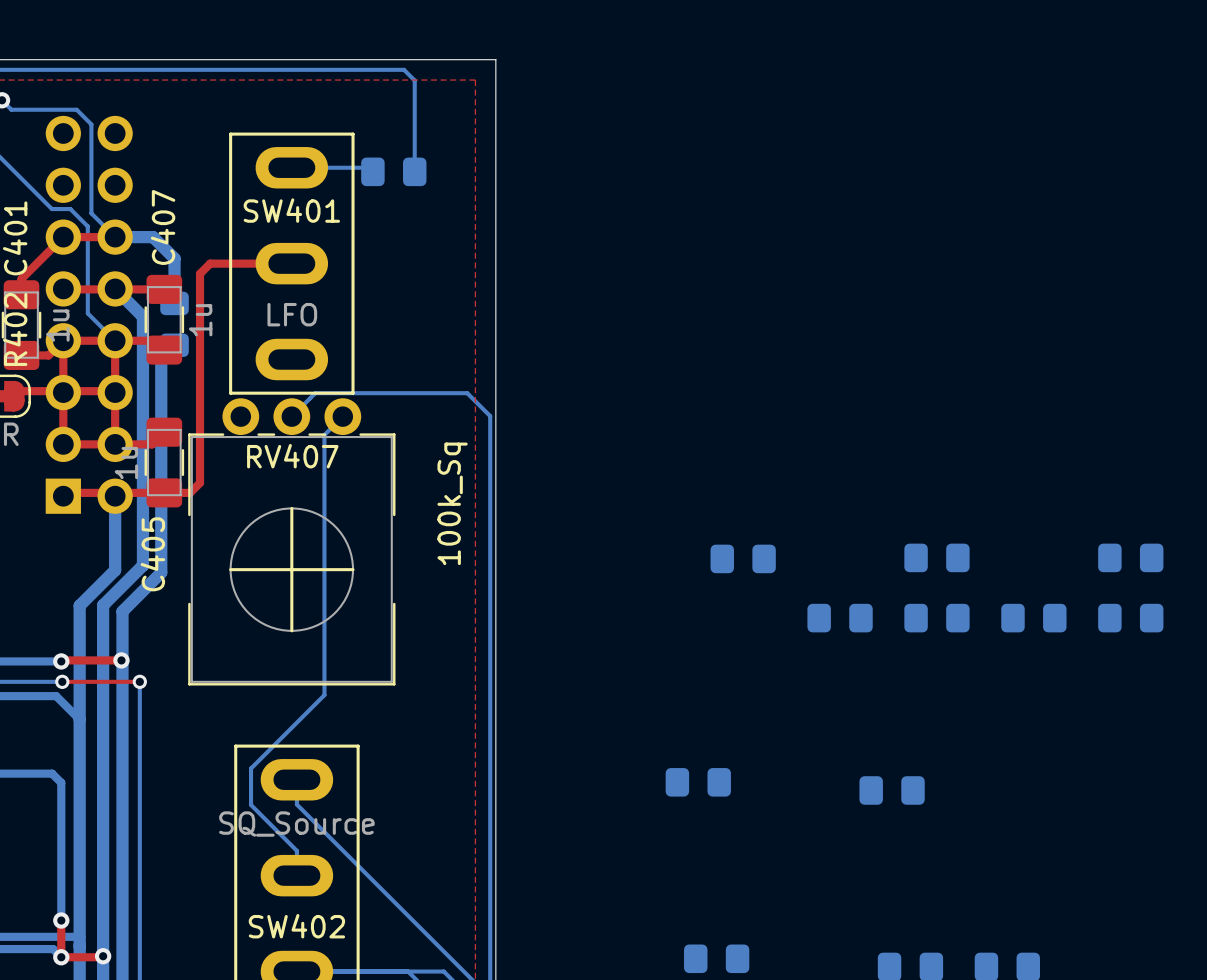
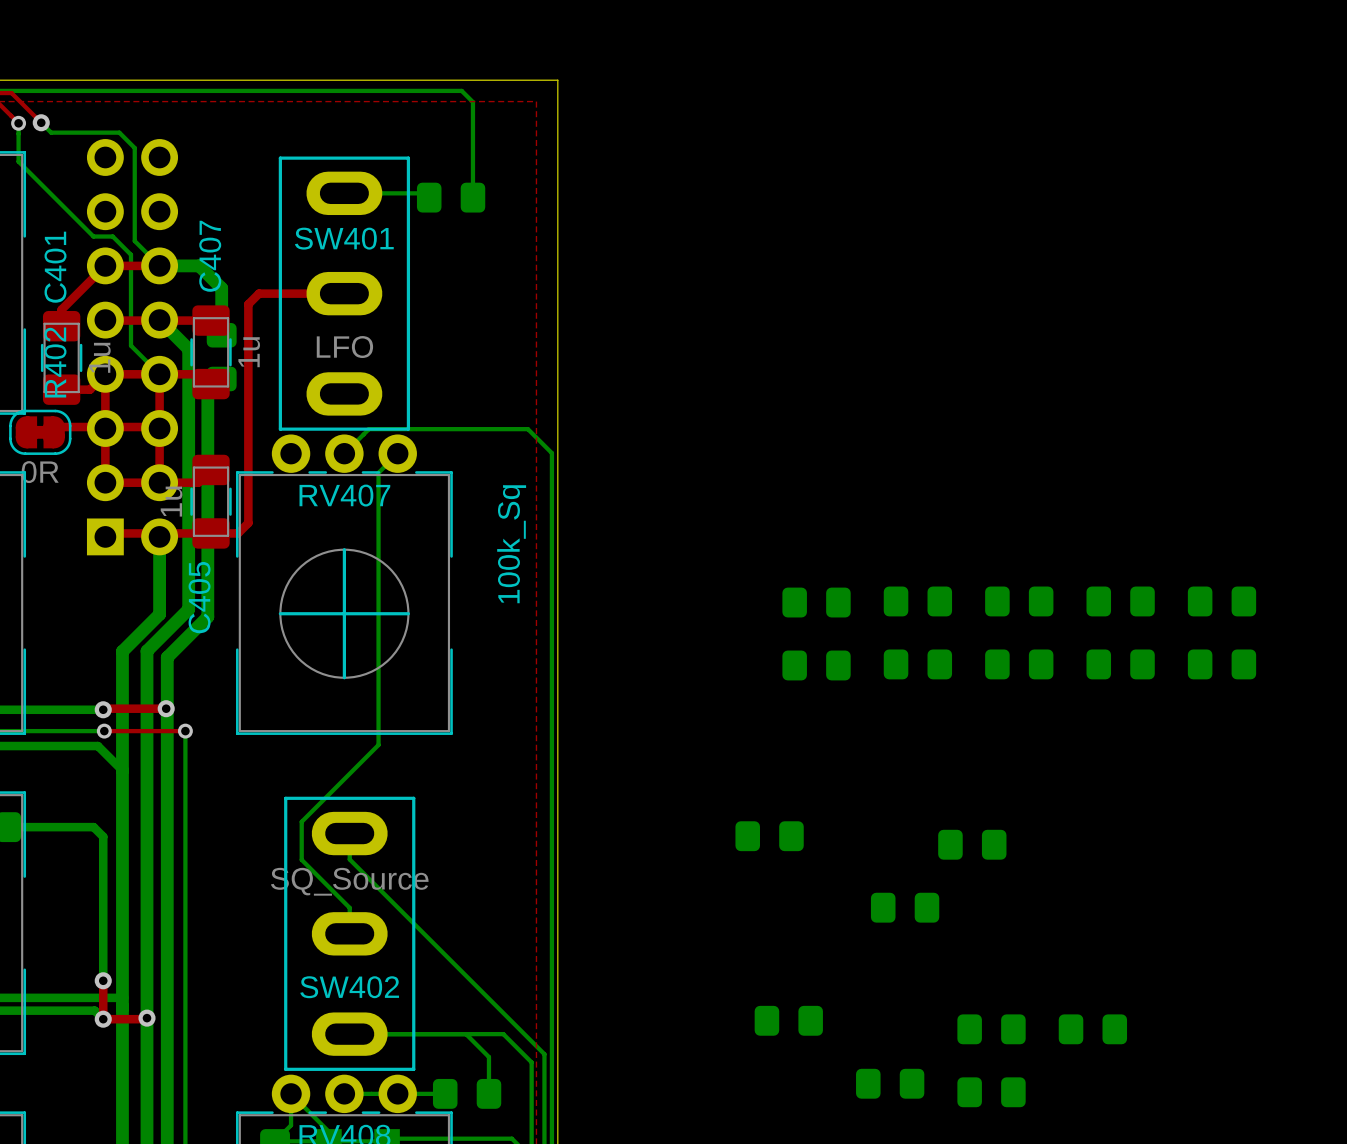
part: none -> (917, 601)
part: none -> (1120, 601)
part: none -> (816, 665)
part: none -> (905, 907)

